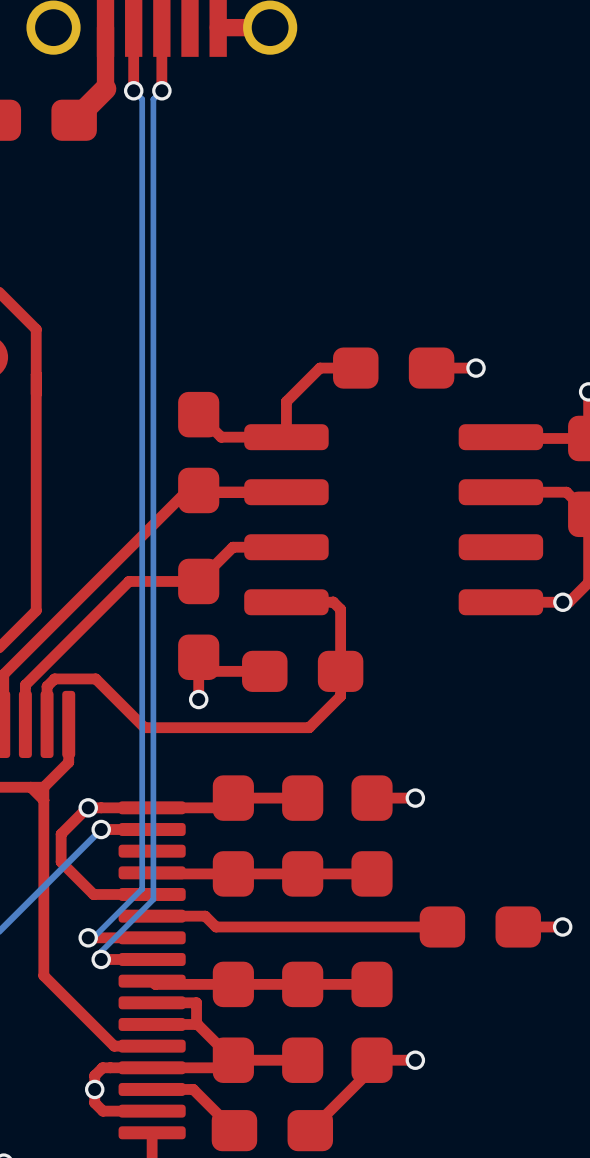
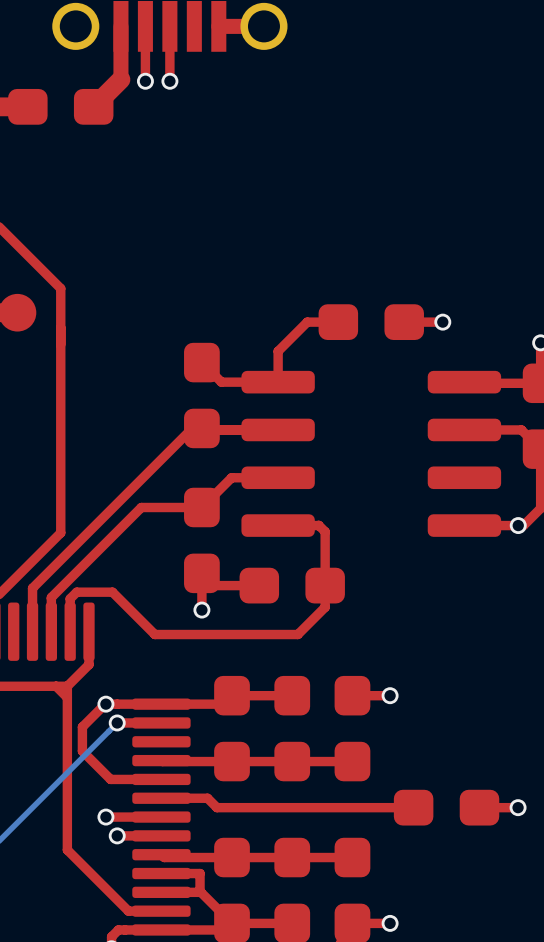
bottom track: (133, 90) (142, 99) (142, 888) (93, 937) (88, 937) -> none
bottom track: (161, 90) (153, 99) (153, 899) (101, 951) (101, 959) -> none

